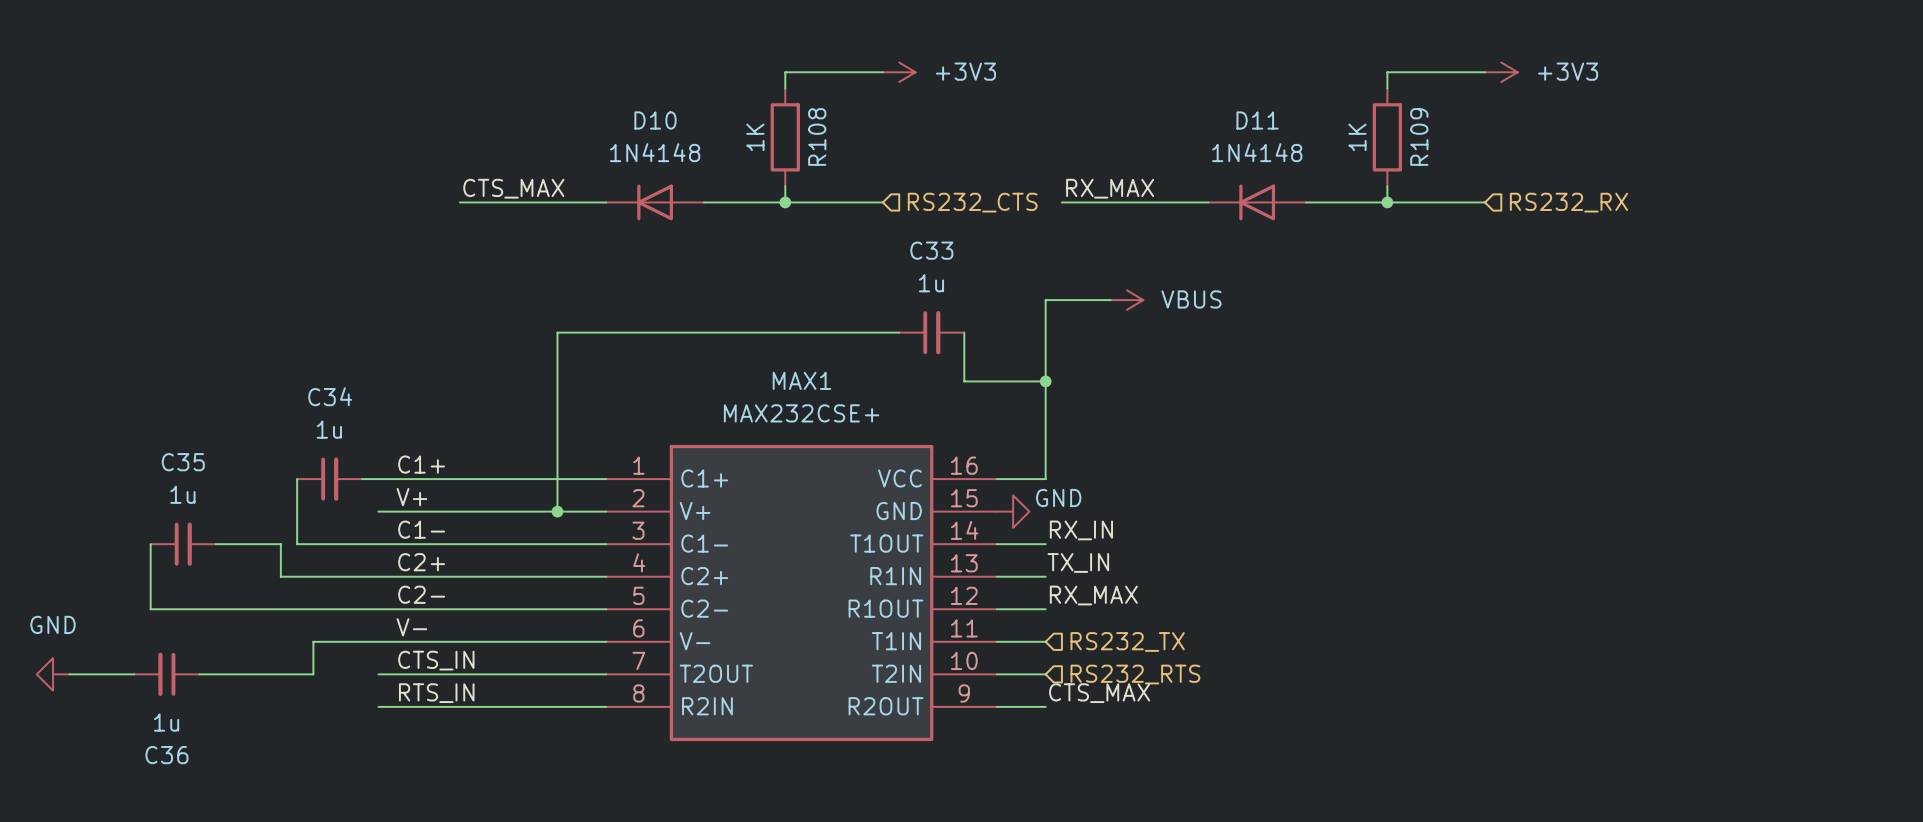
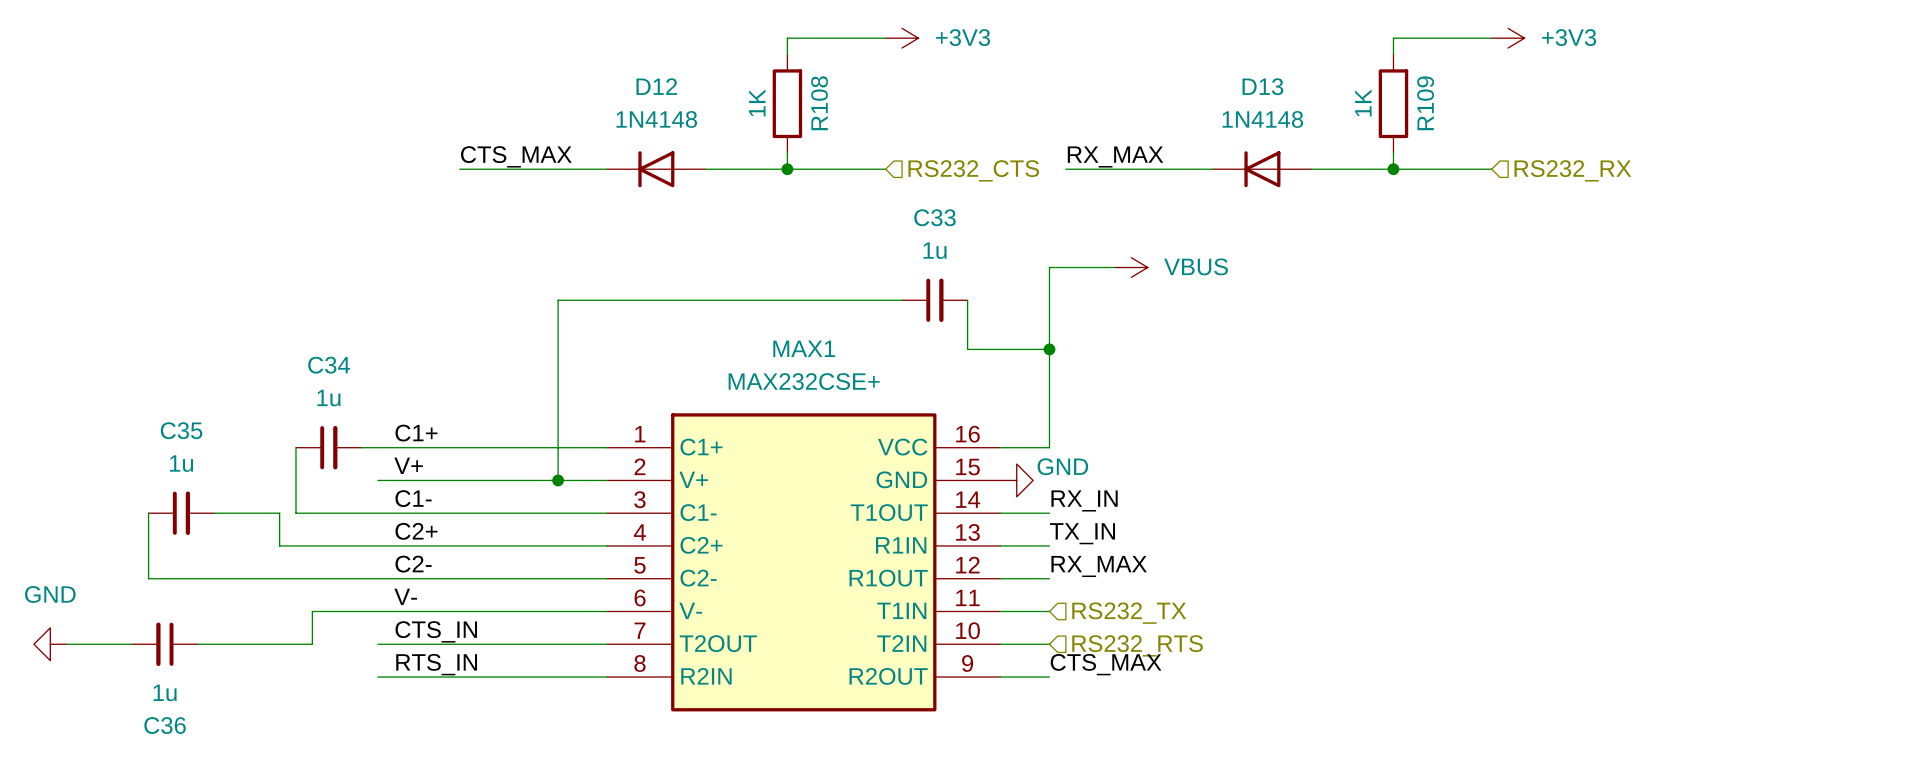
D10 name: D10 (655, 120) -> D12 (656, 86)
D11 name: D11 (1257, 120) -> D13 (1262, 86)

